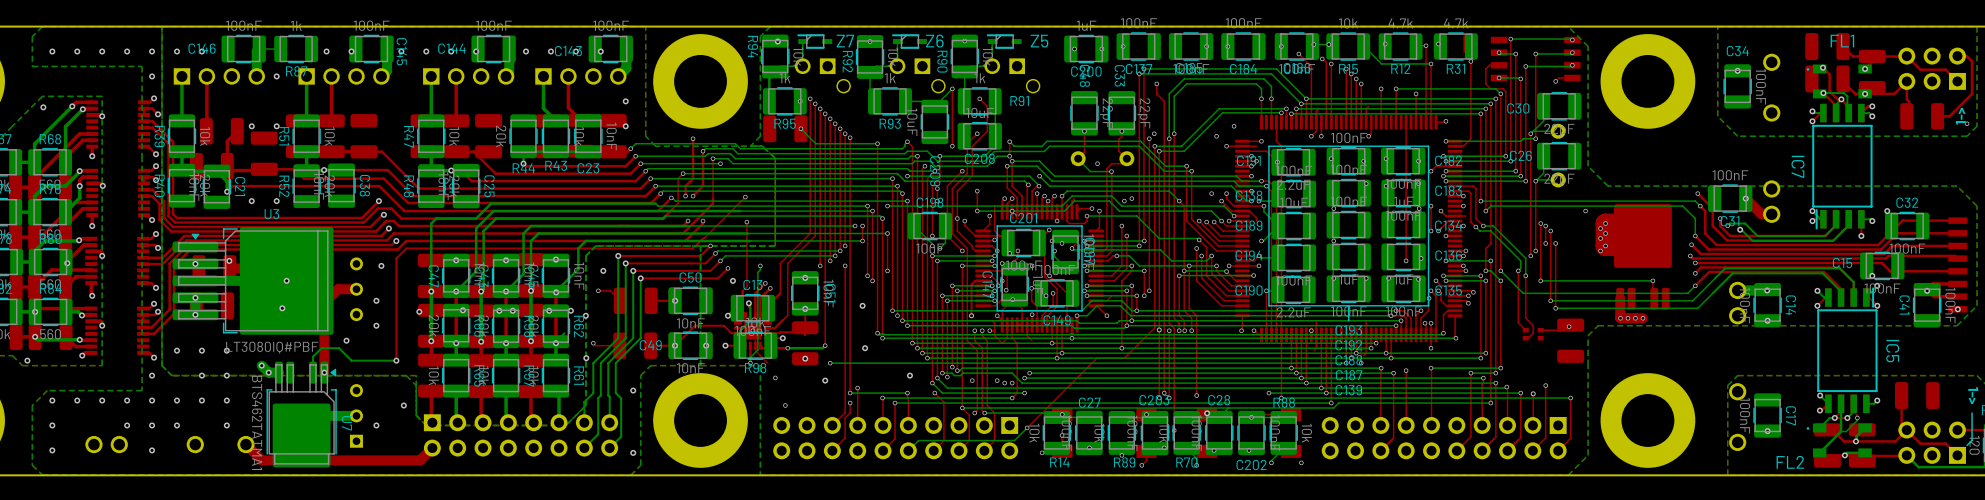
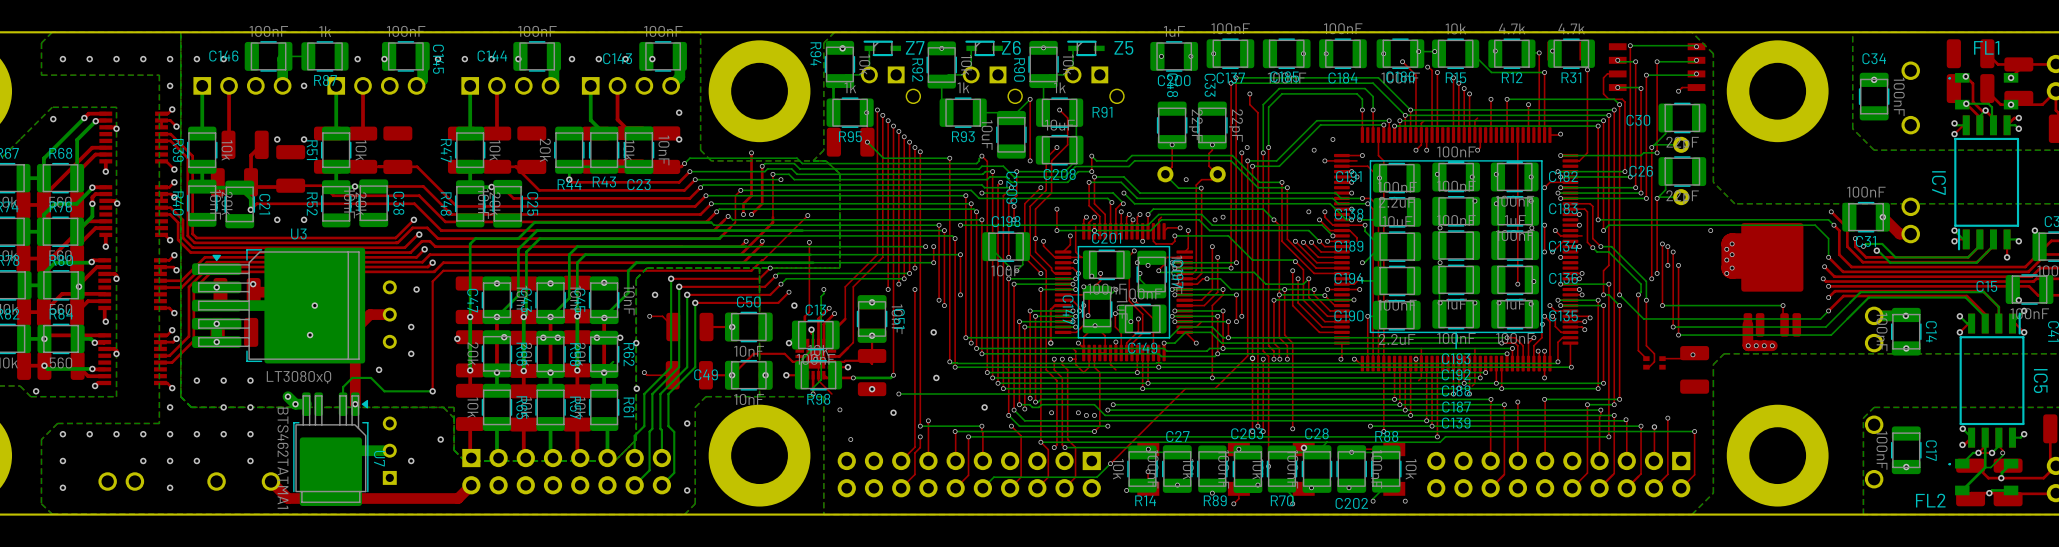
U3 value: LT3080IQ#PBF (272, 347) -> LT3080xQ (298, 377)

